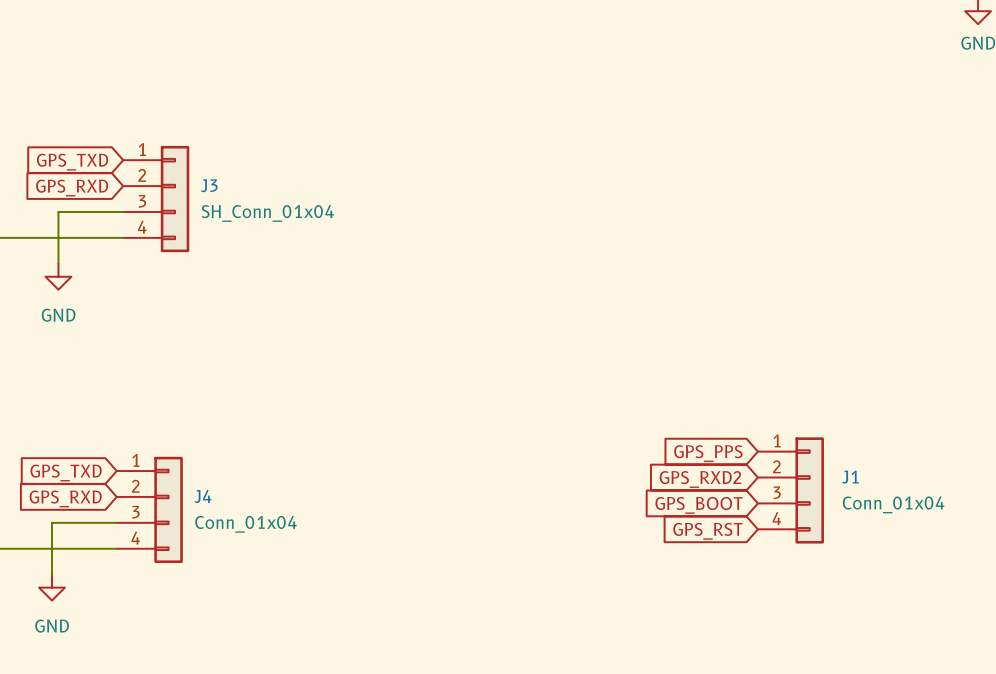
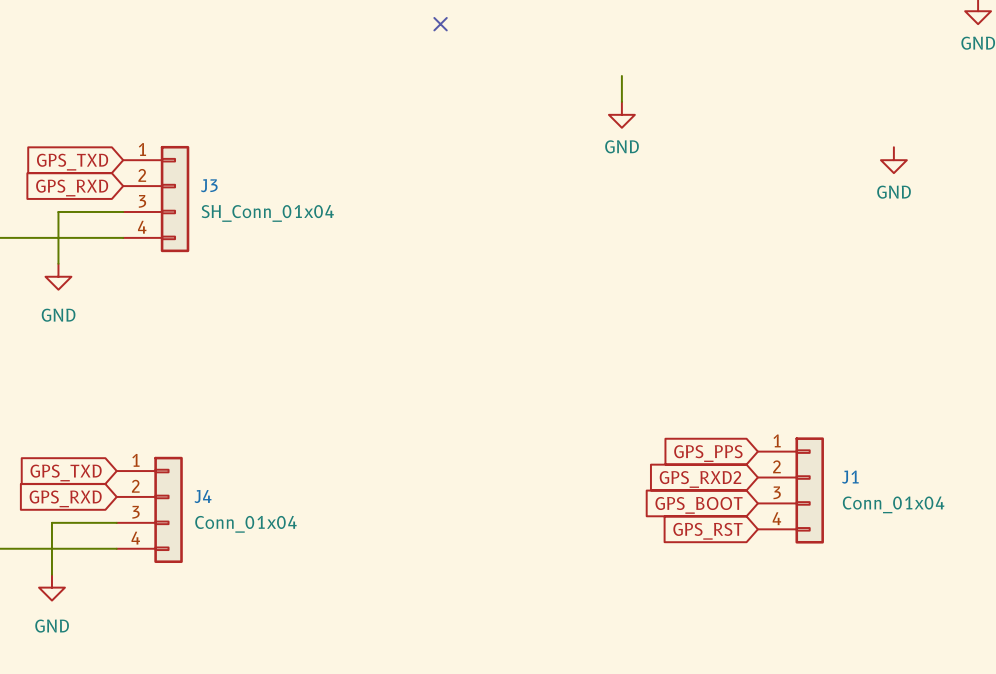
no-connect mark: none -> (440, 24)
wire: none -> (621, 75) (621, 101)
power symbol: none -> GND (621, 114)
power symbol: none -> GND (893, 160)

